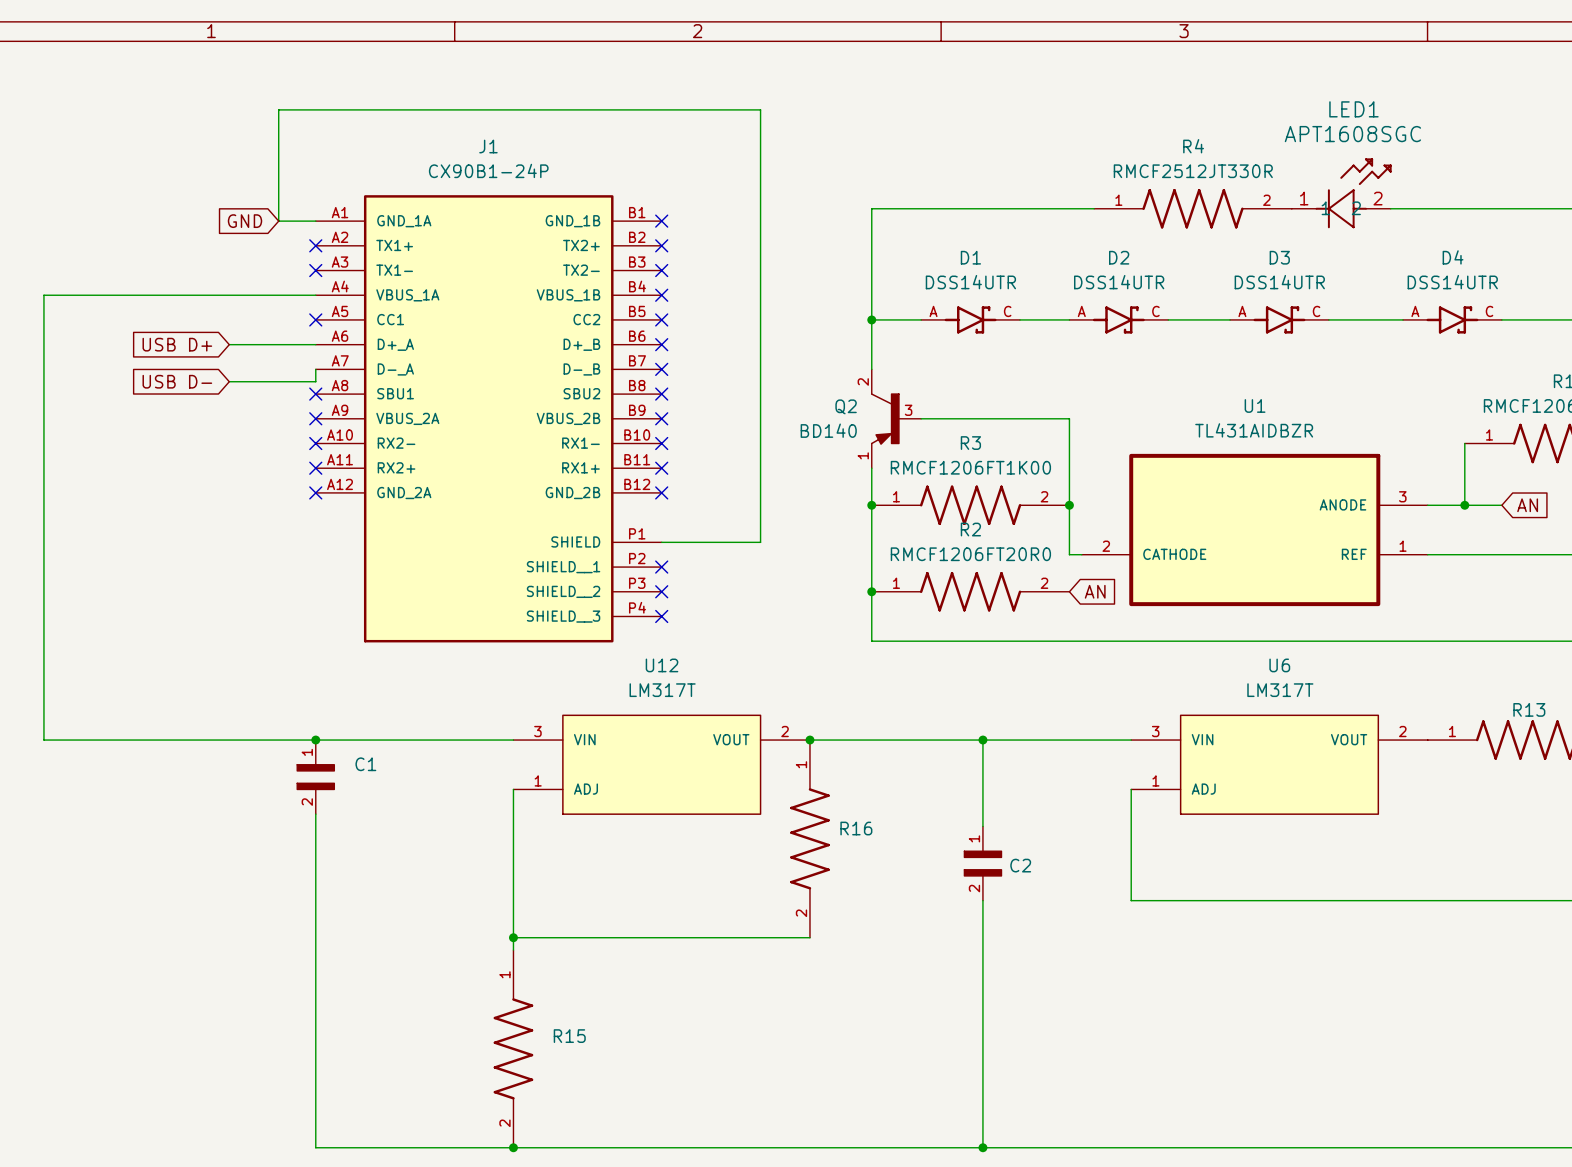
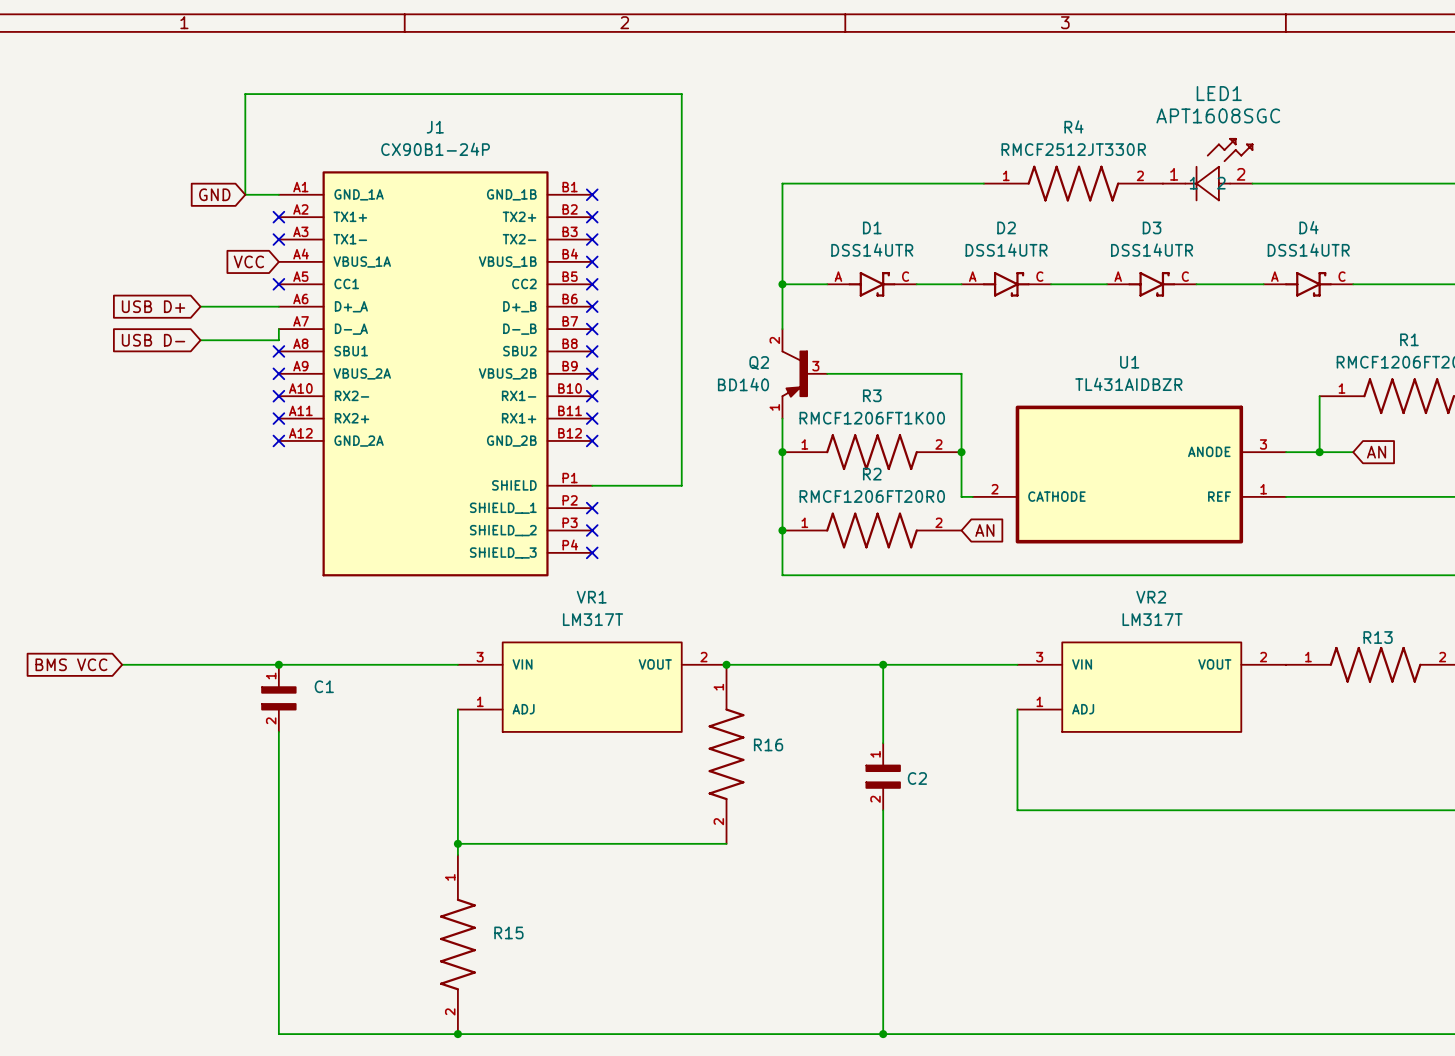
global label: none -> VCC (248, 261)
wire: (315, 295) (43, 295) (43, 740) (142, 740) -> none
U12 name: U12 (662, 665) -> VR1 (591, 597)
U6 name: U6 (1279, 665) -> VR2 (1151, 597)
global label: none -> BMS VCC (71, 664)

